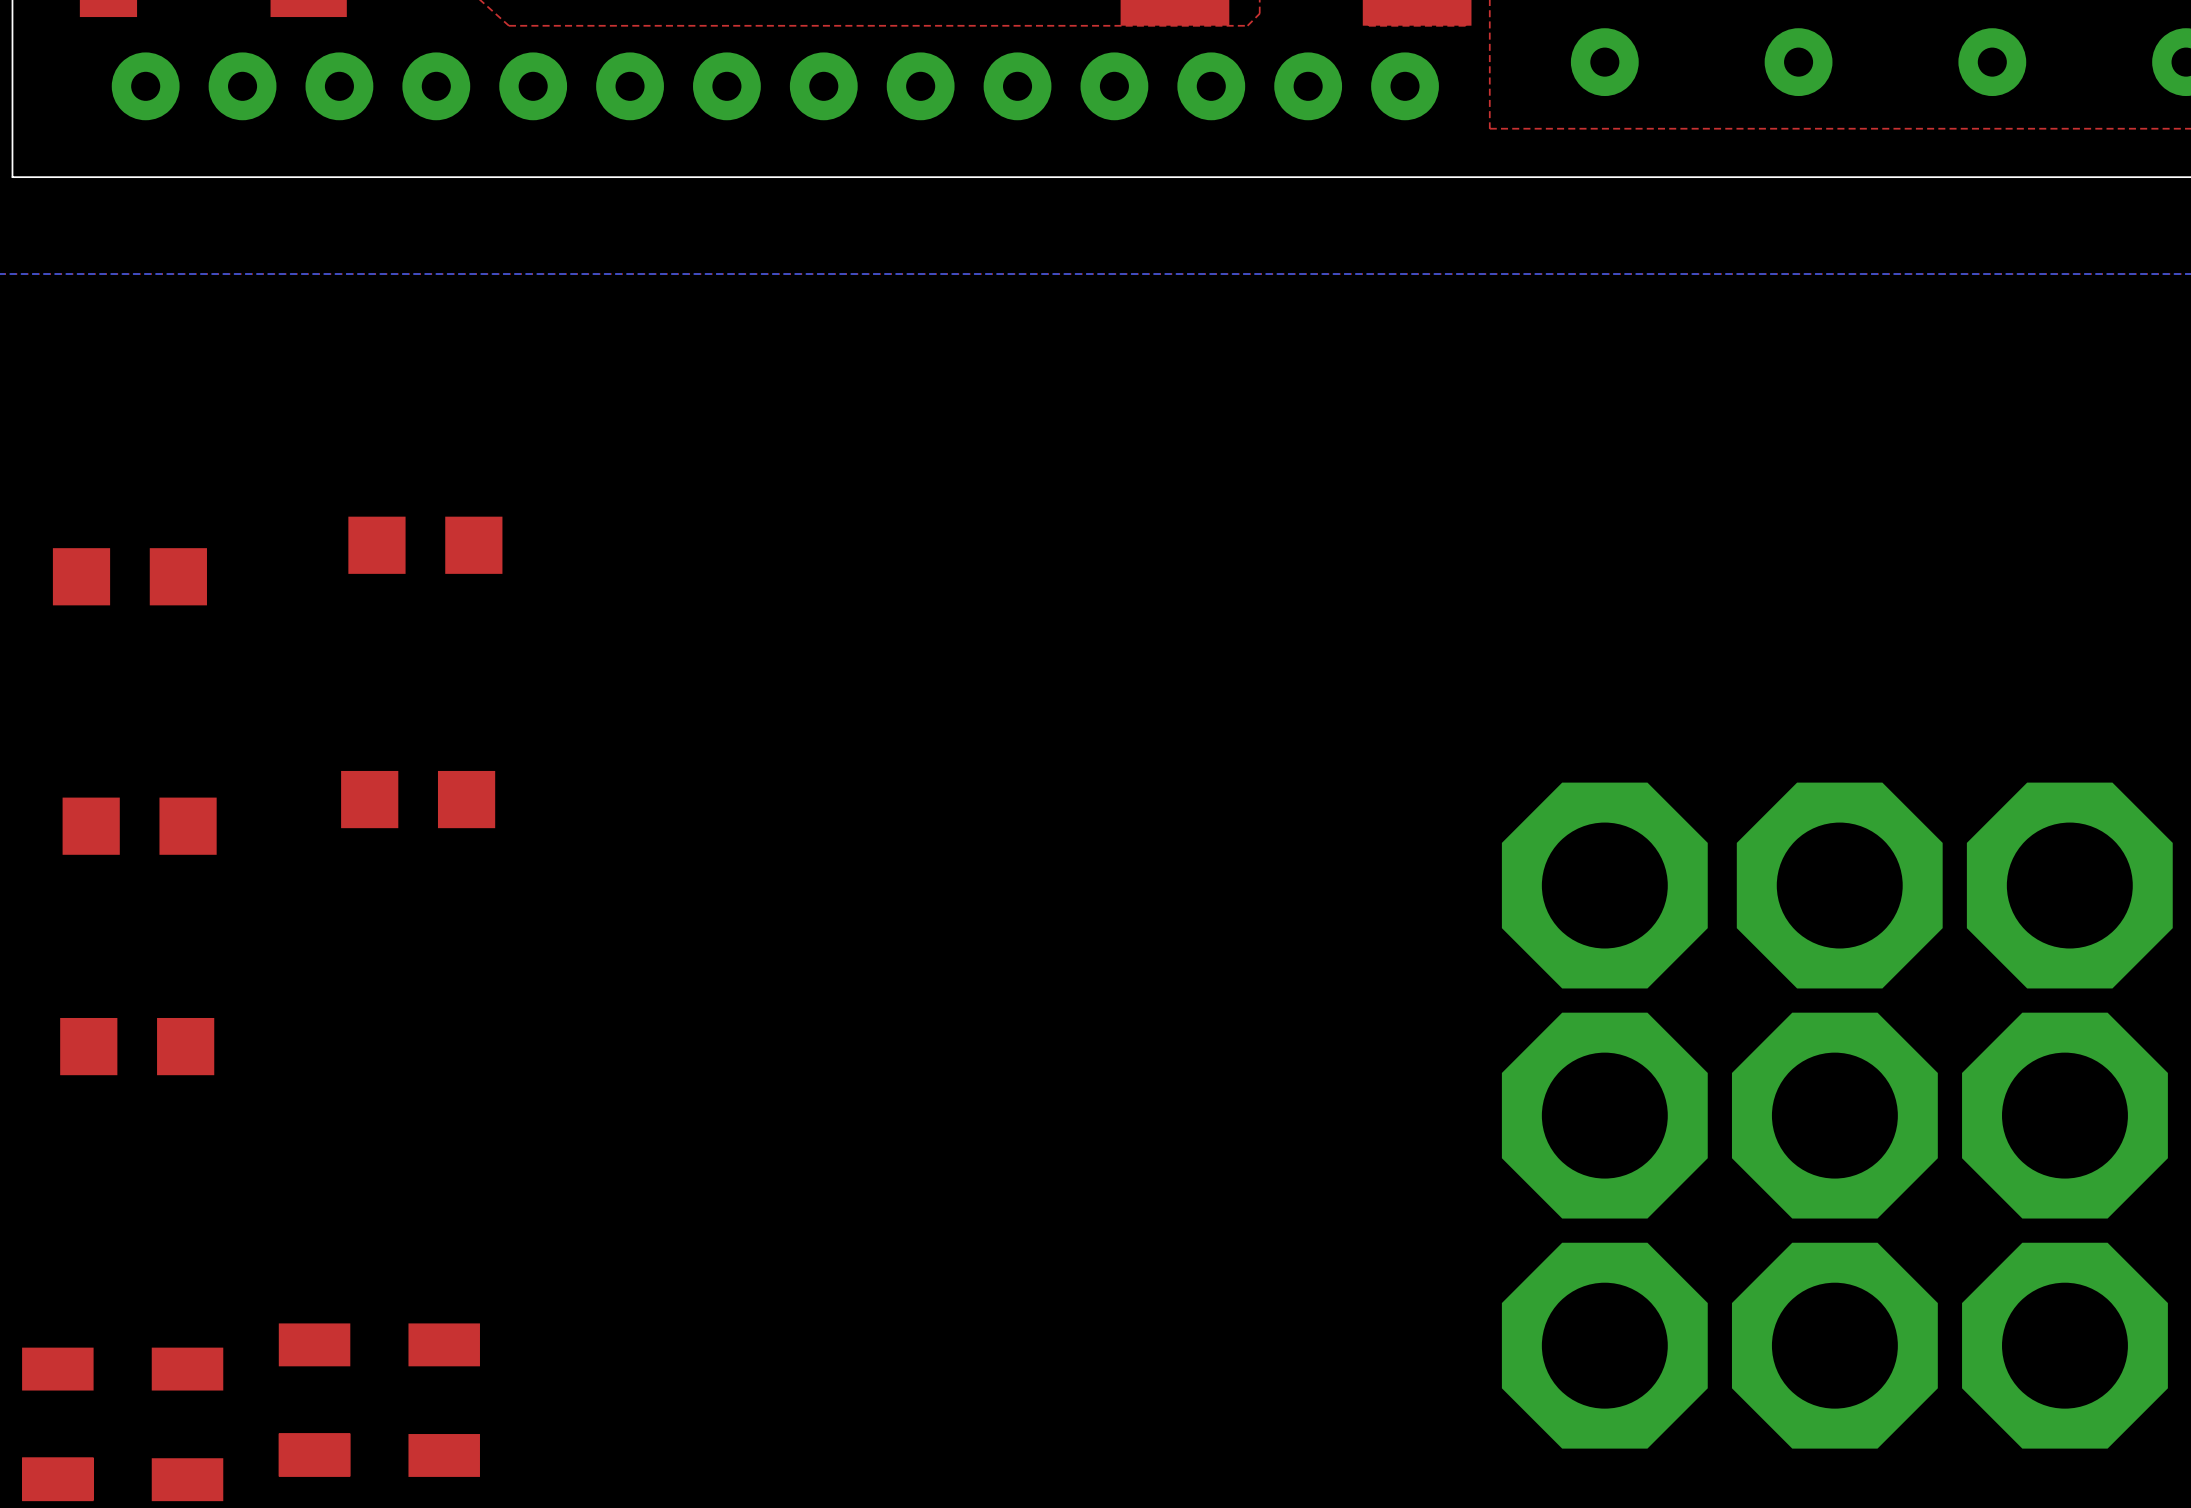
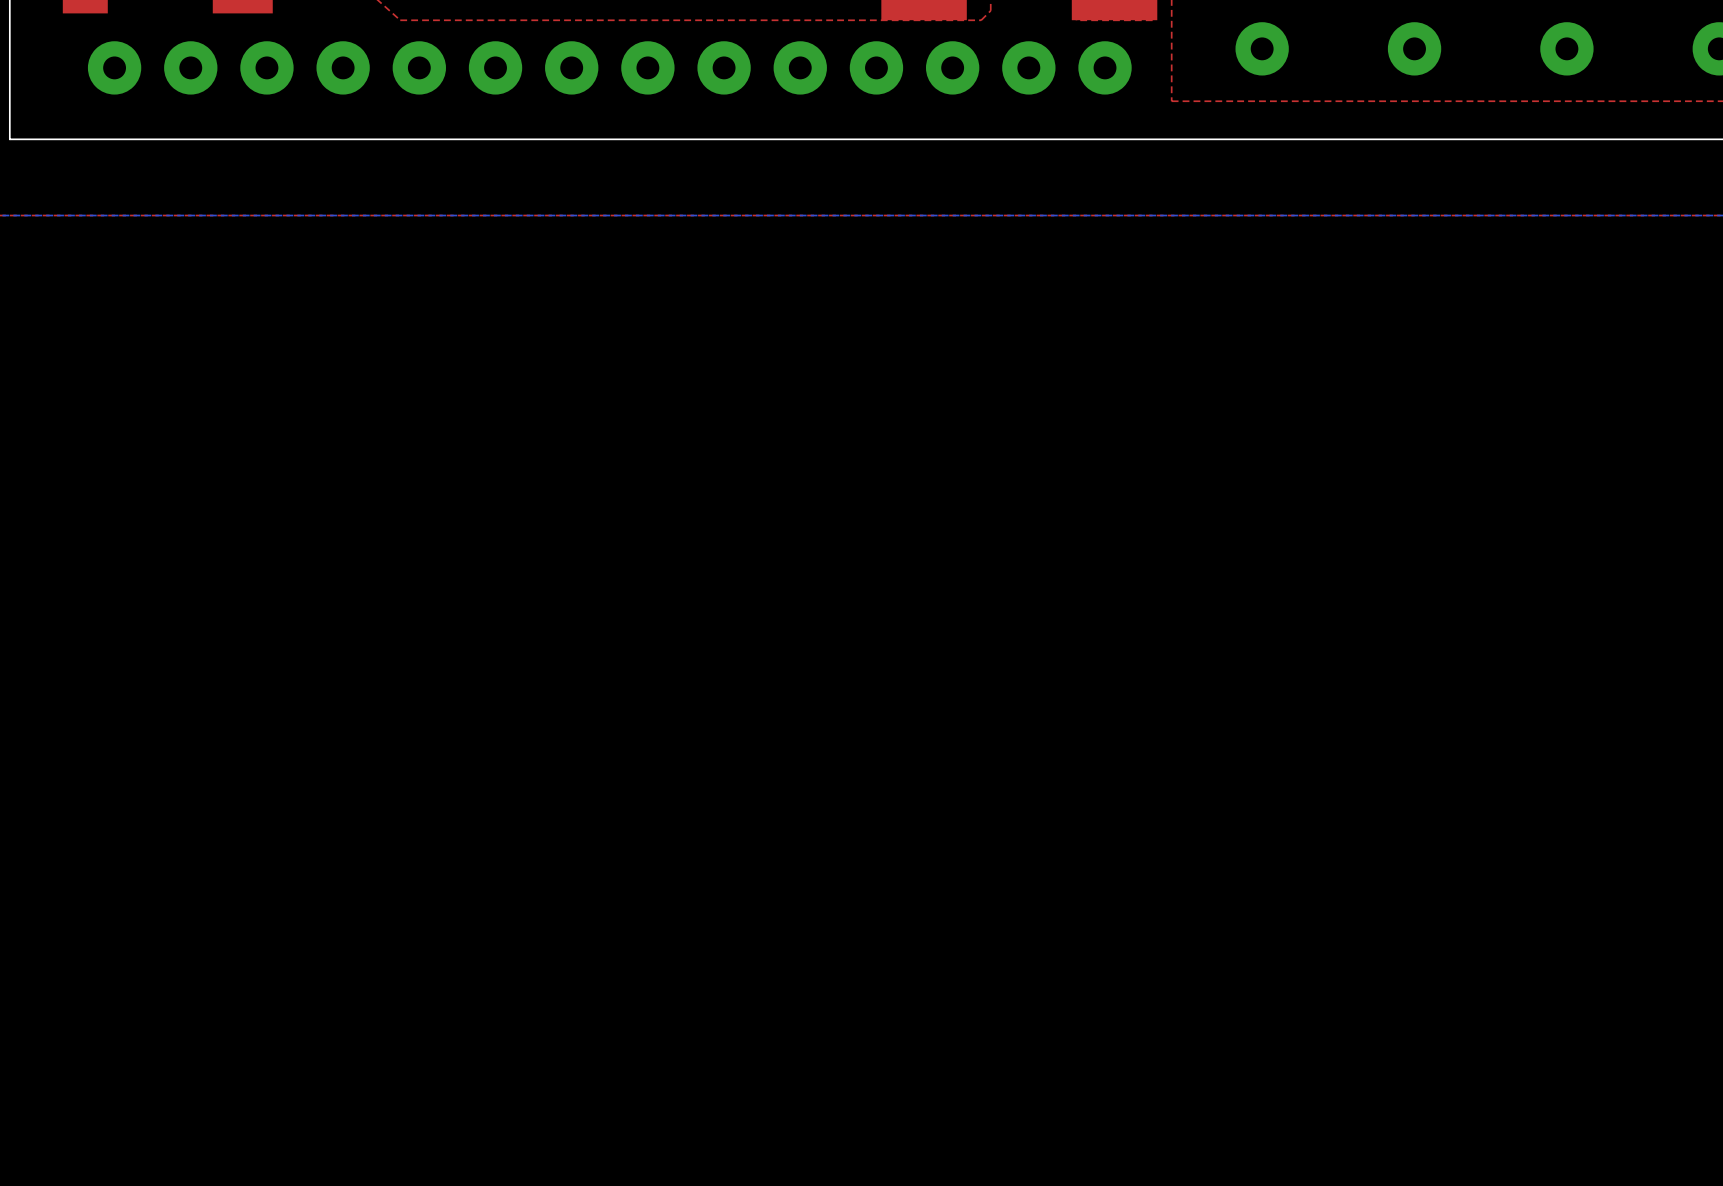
part: (425, 545) -> none
part: (129, 576) -> none
part: (418, 799) -> none
part: (139, 826) -> none
part: (1604, 885) -> none
part: (1839, 885) -> none
part: (2069, 885) -> none
part: (137, 1046) -> none
part: (1604, 1115) -> none
part: (1834, 1115) -> none
part: (2064, 1115) -> none
part: (1604, 1345) -> none
part: (1834, 1345) -> none
part: (2064, 1345) -> none
part: (379, 1400) -> none
part: (122, 1424) -> none

